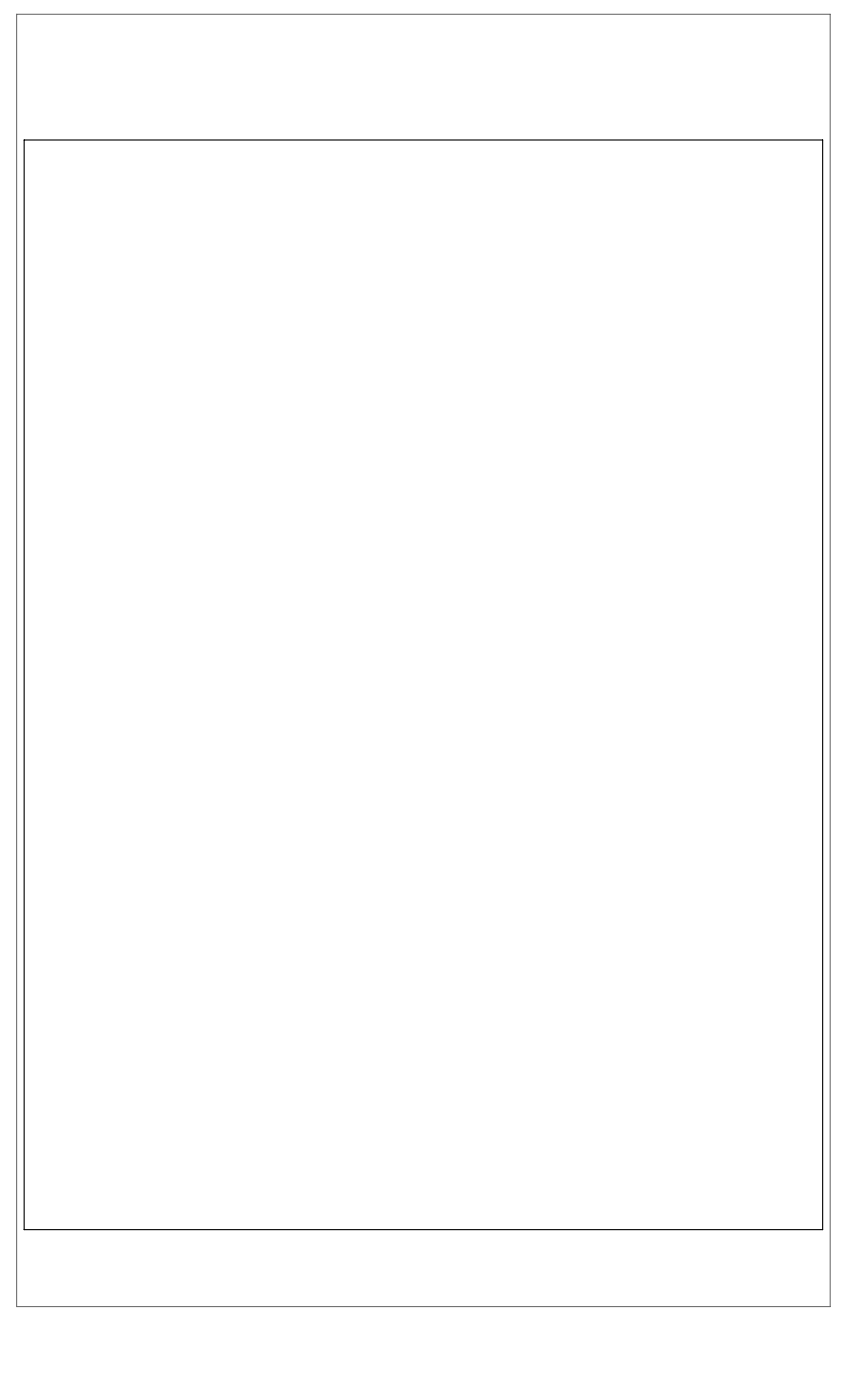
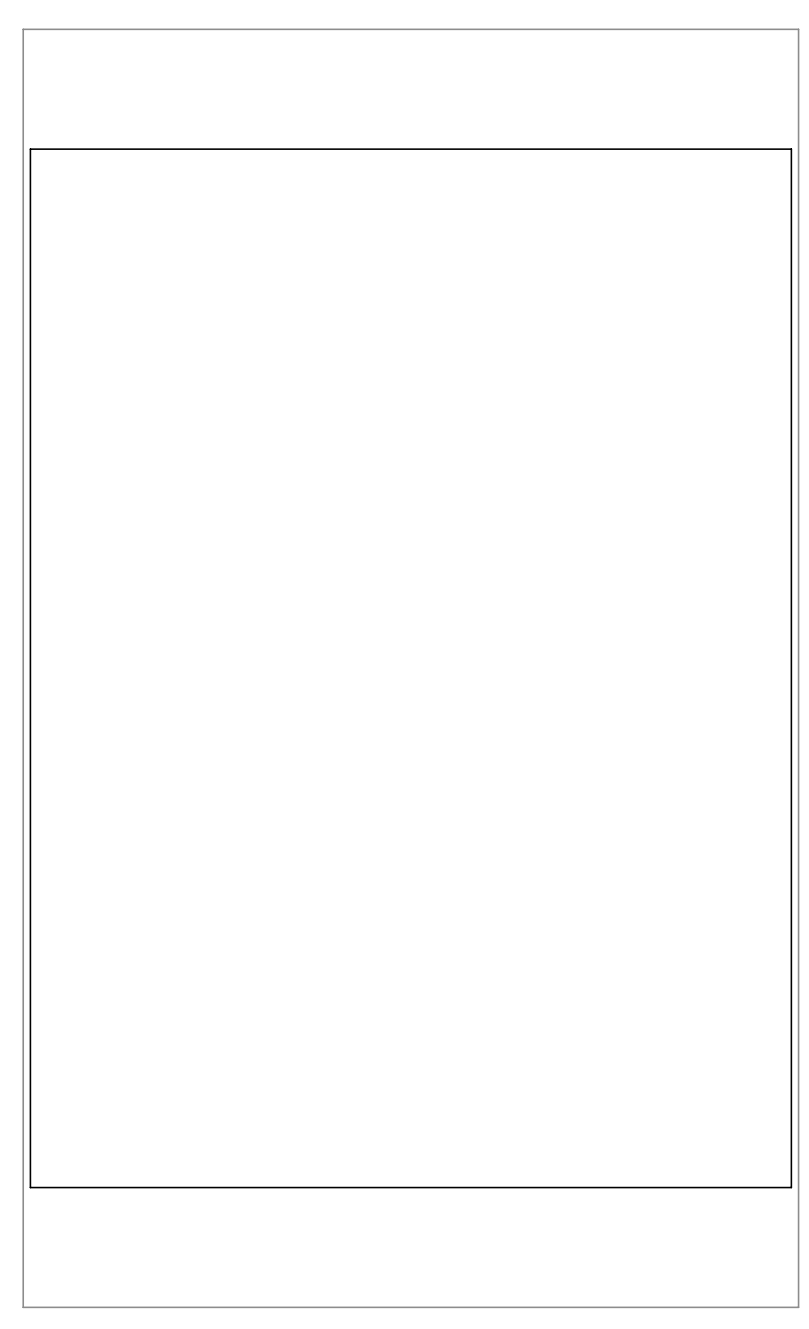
line: (16, 1306) (830, 1306) -> (23, 1260) (23, 1307) (798, 1307) (798, 1260)

